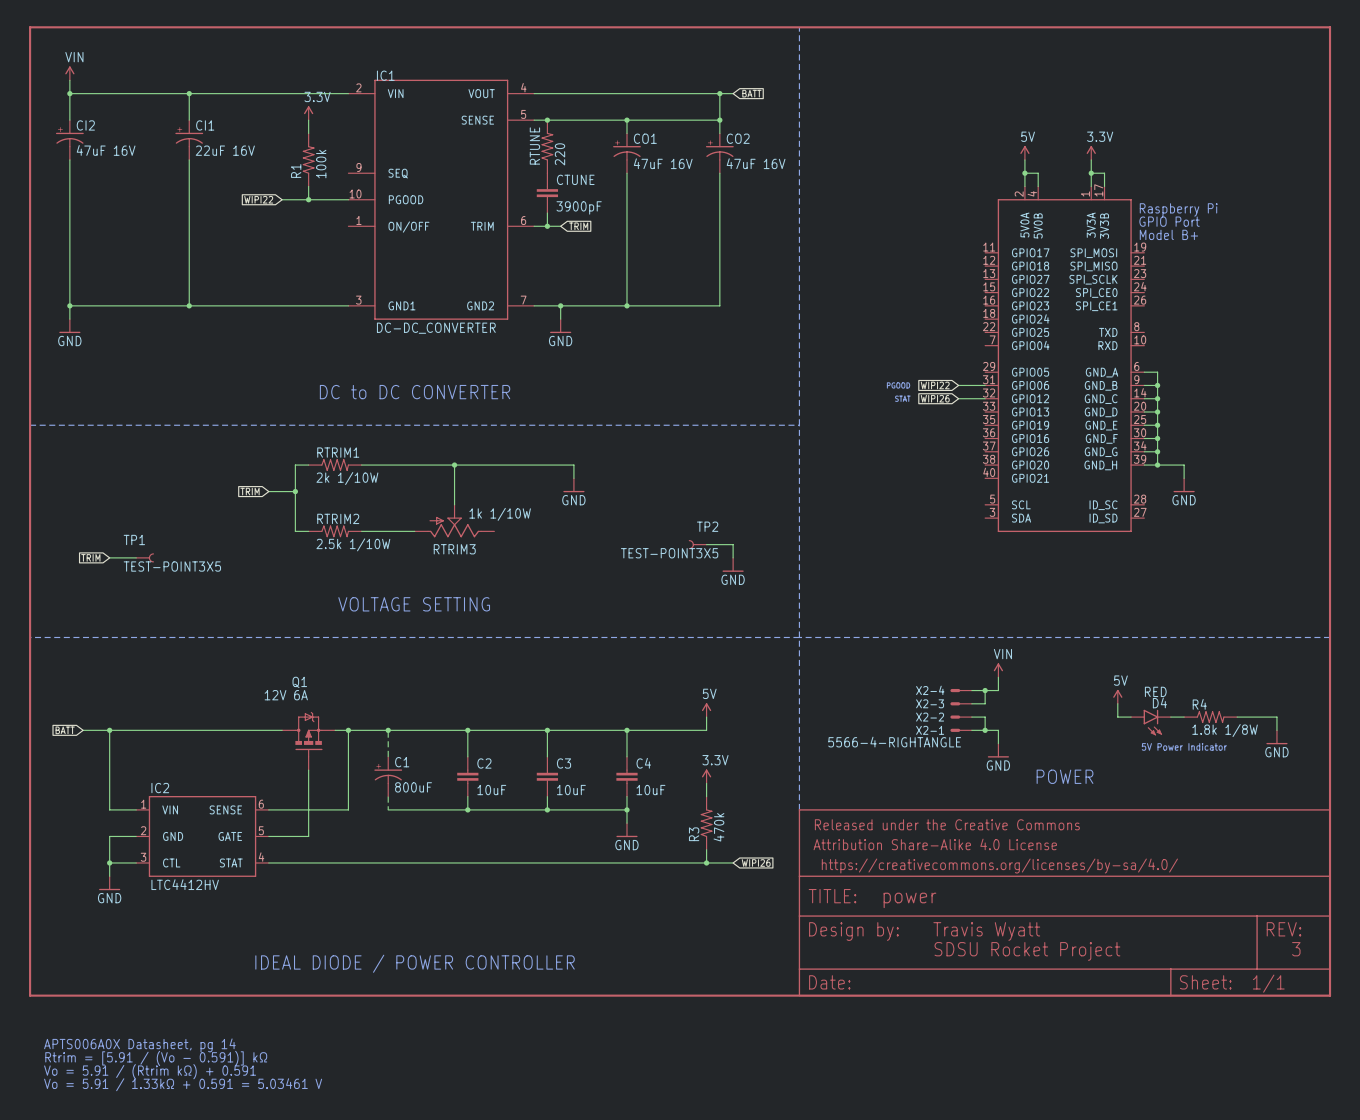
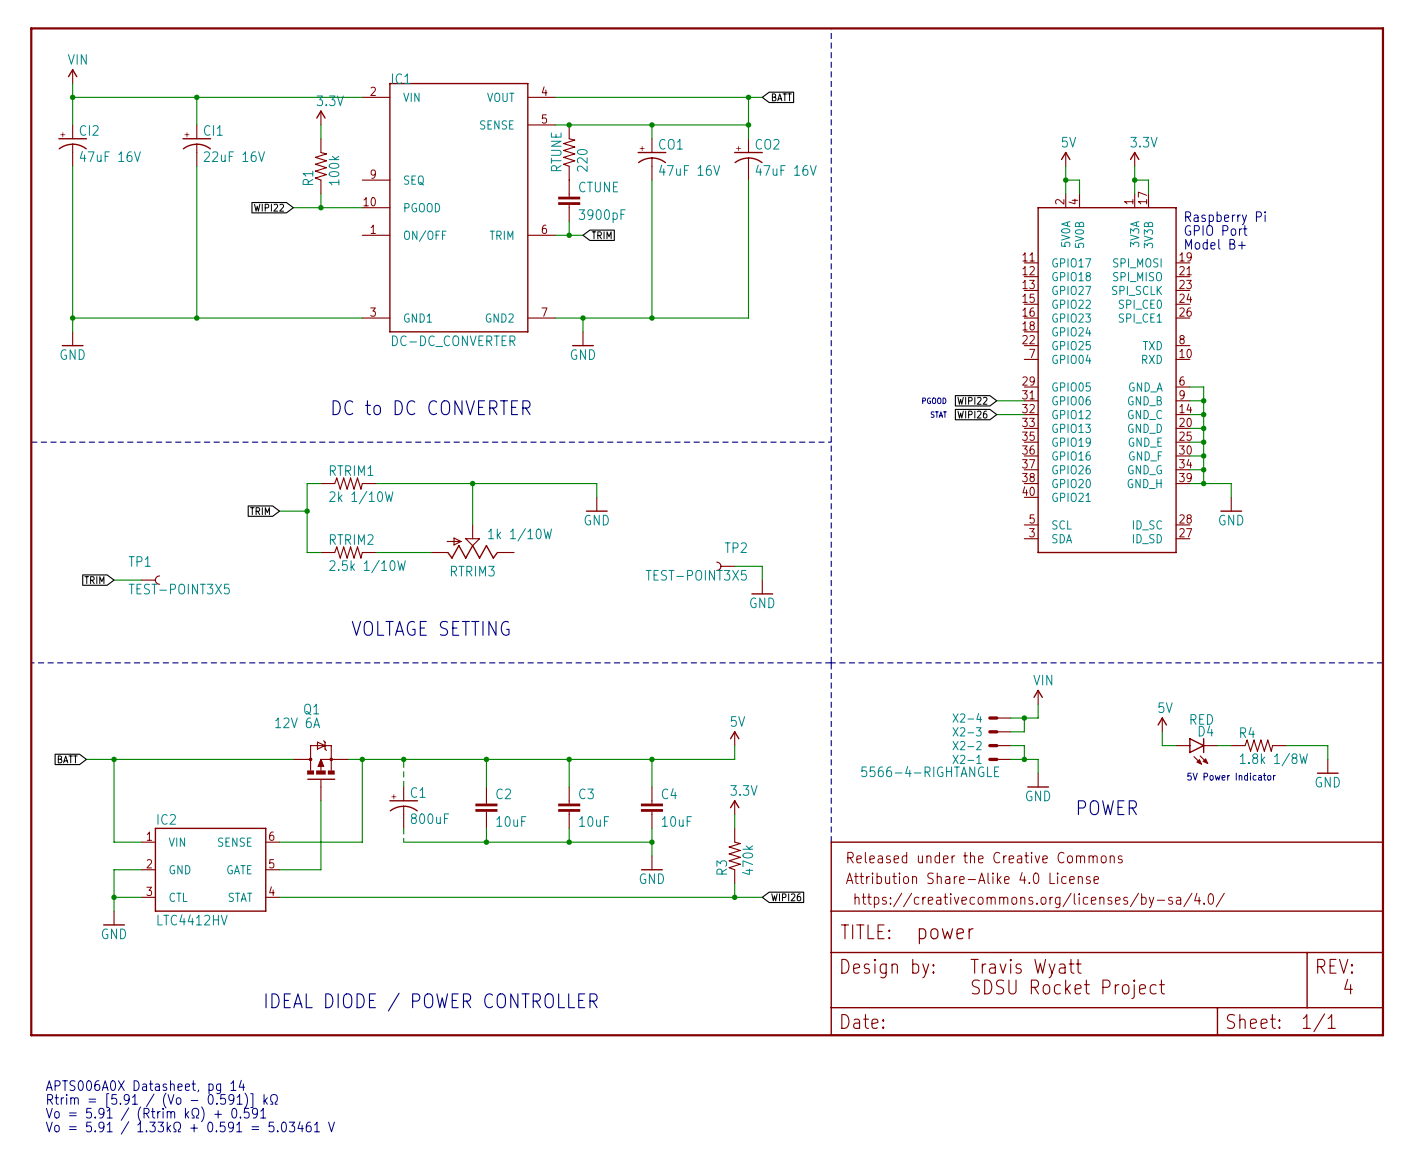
text: 3 (1296, 949) -> 4 (1348, 986)

